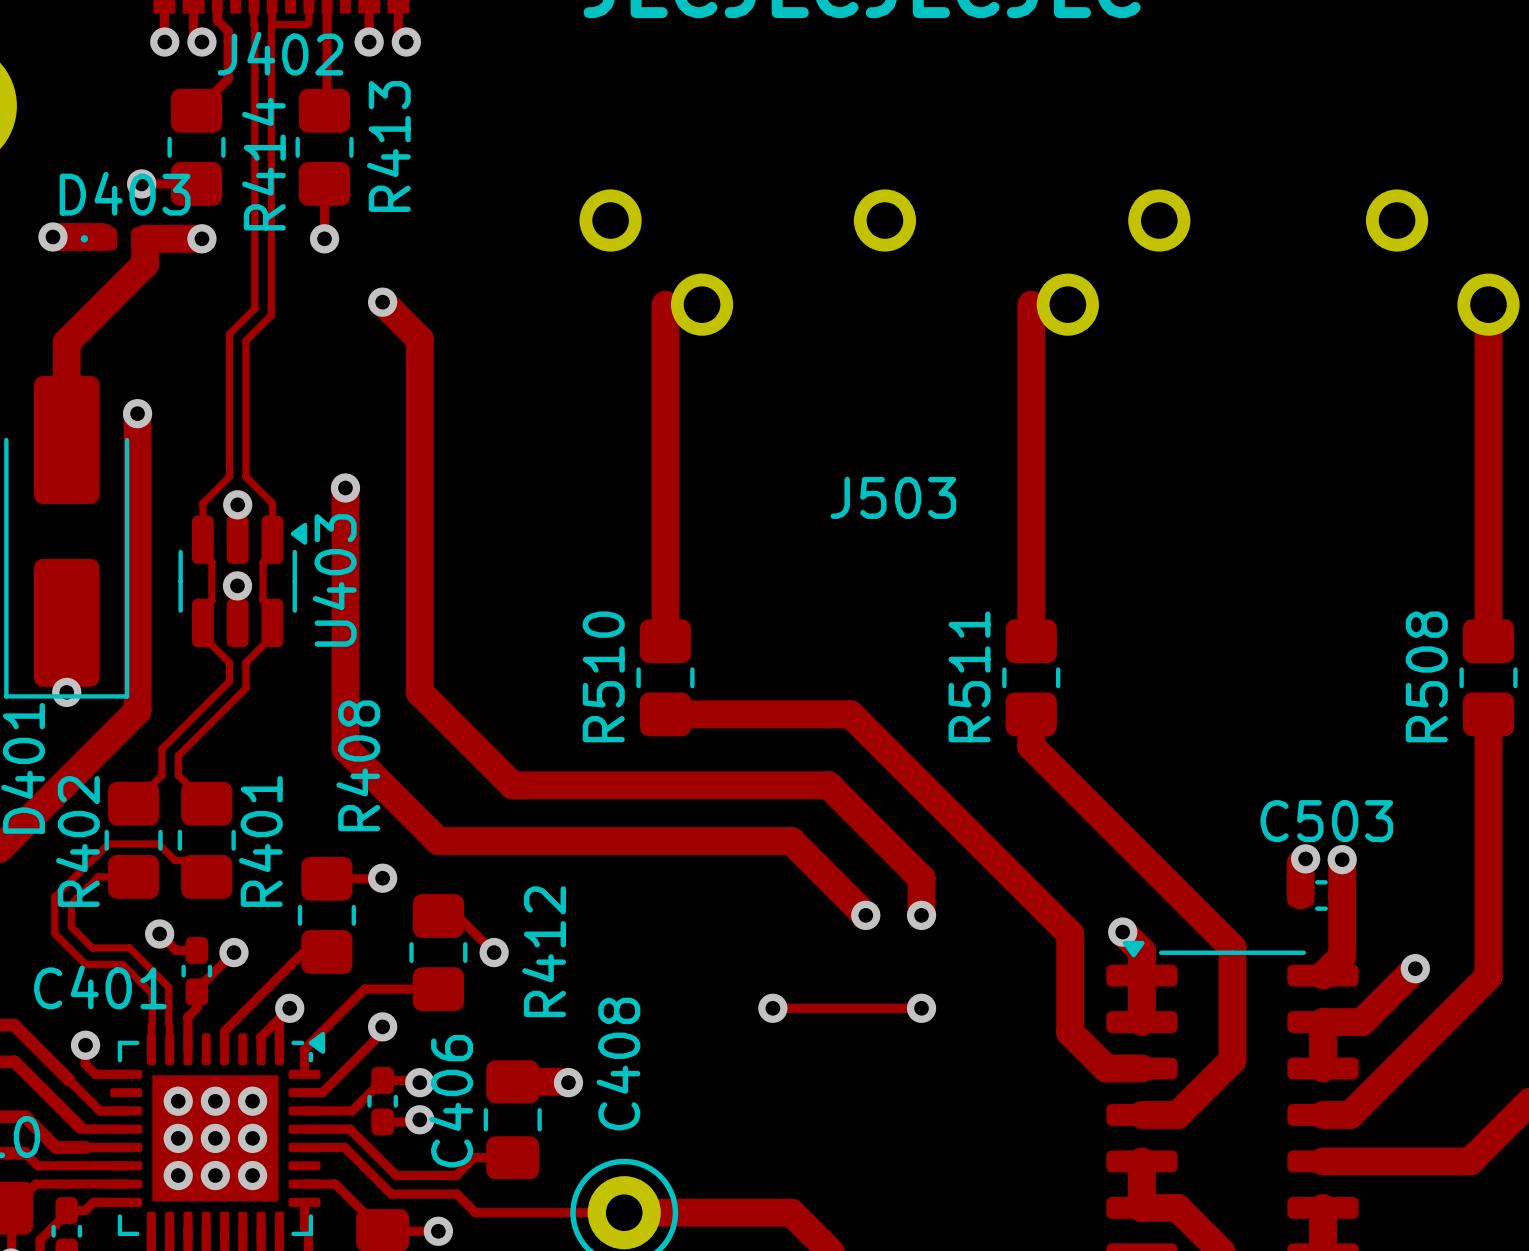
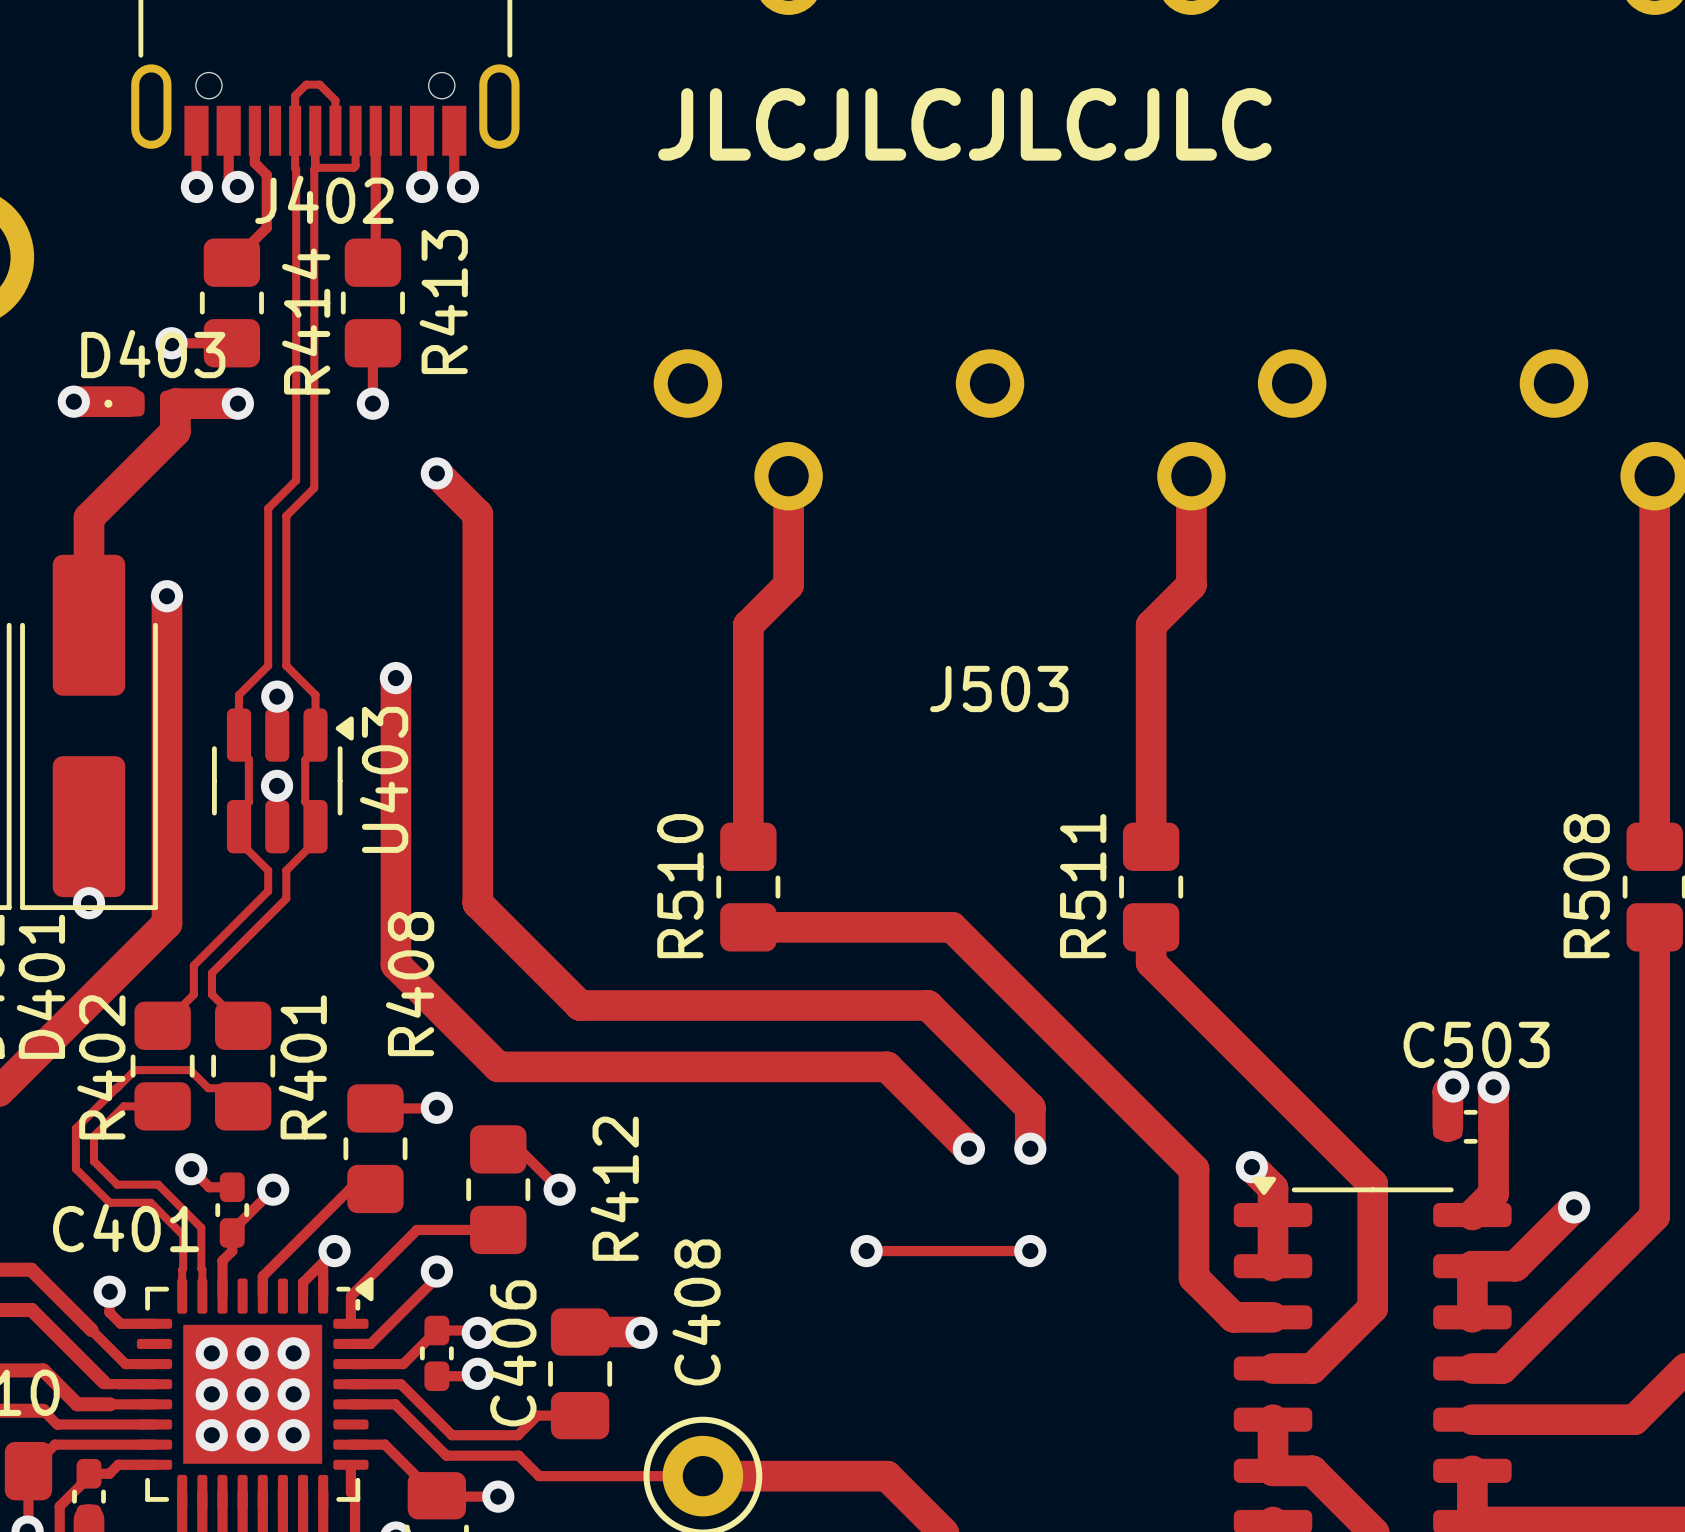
track: (665, 304) (665, 440) -> (788, 476) (788, 584) (748, 625)
track: (1031, 304) (1031, 440) -> (1191, 476) (1191, 584) (1151, 625)

